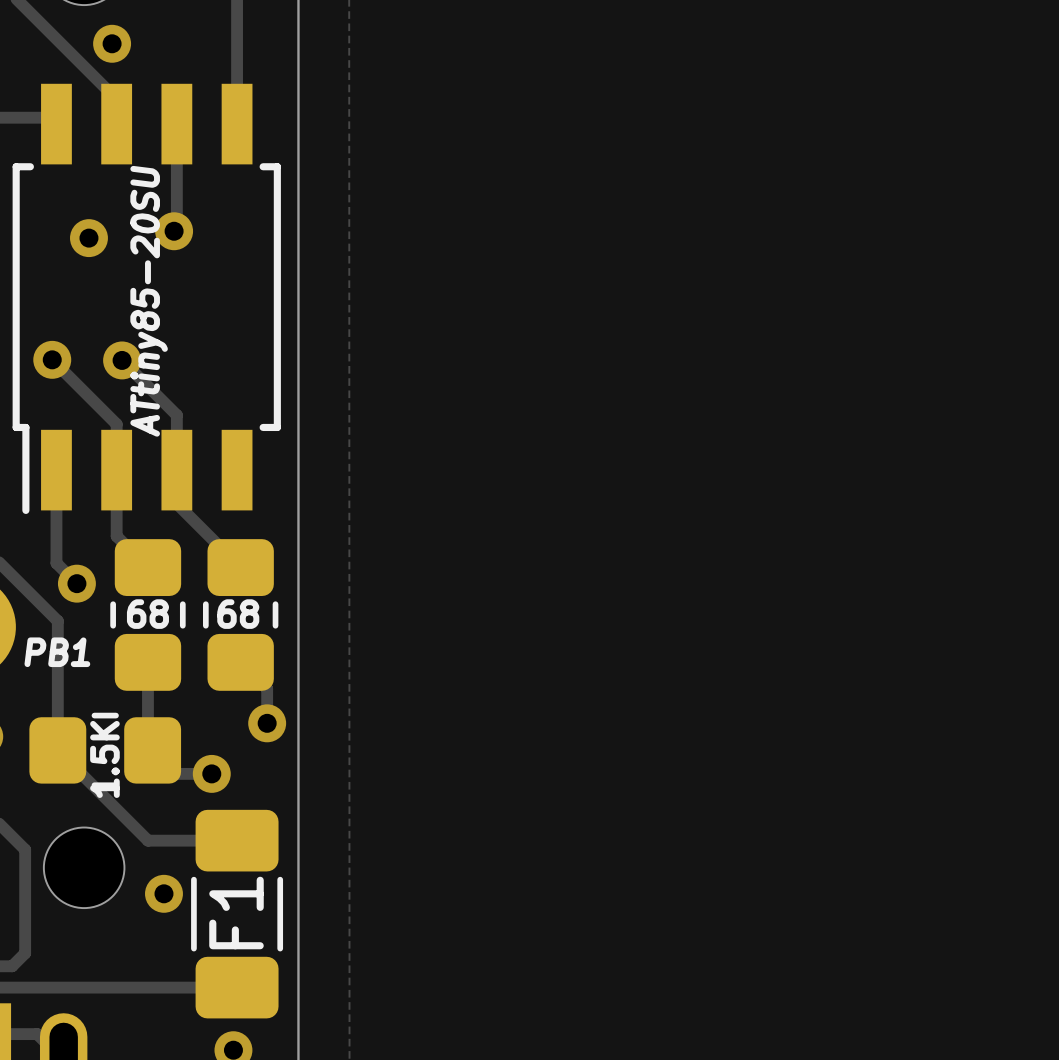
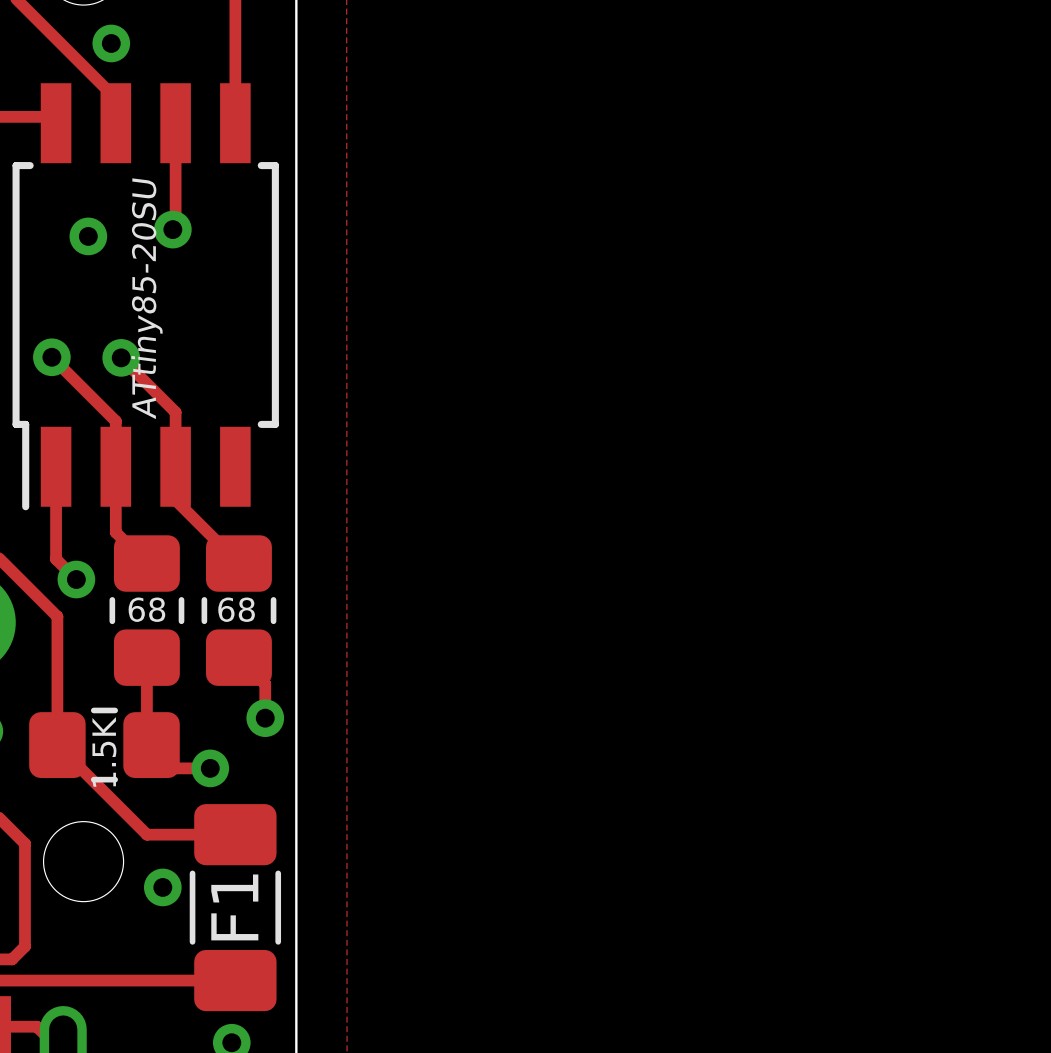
text: PB1 (57, 652) -> none

